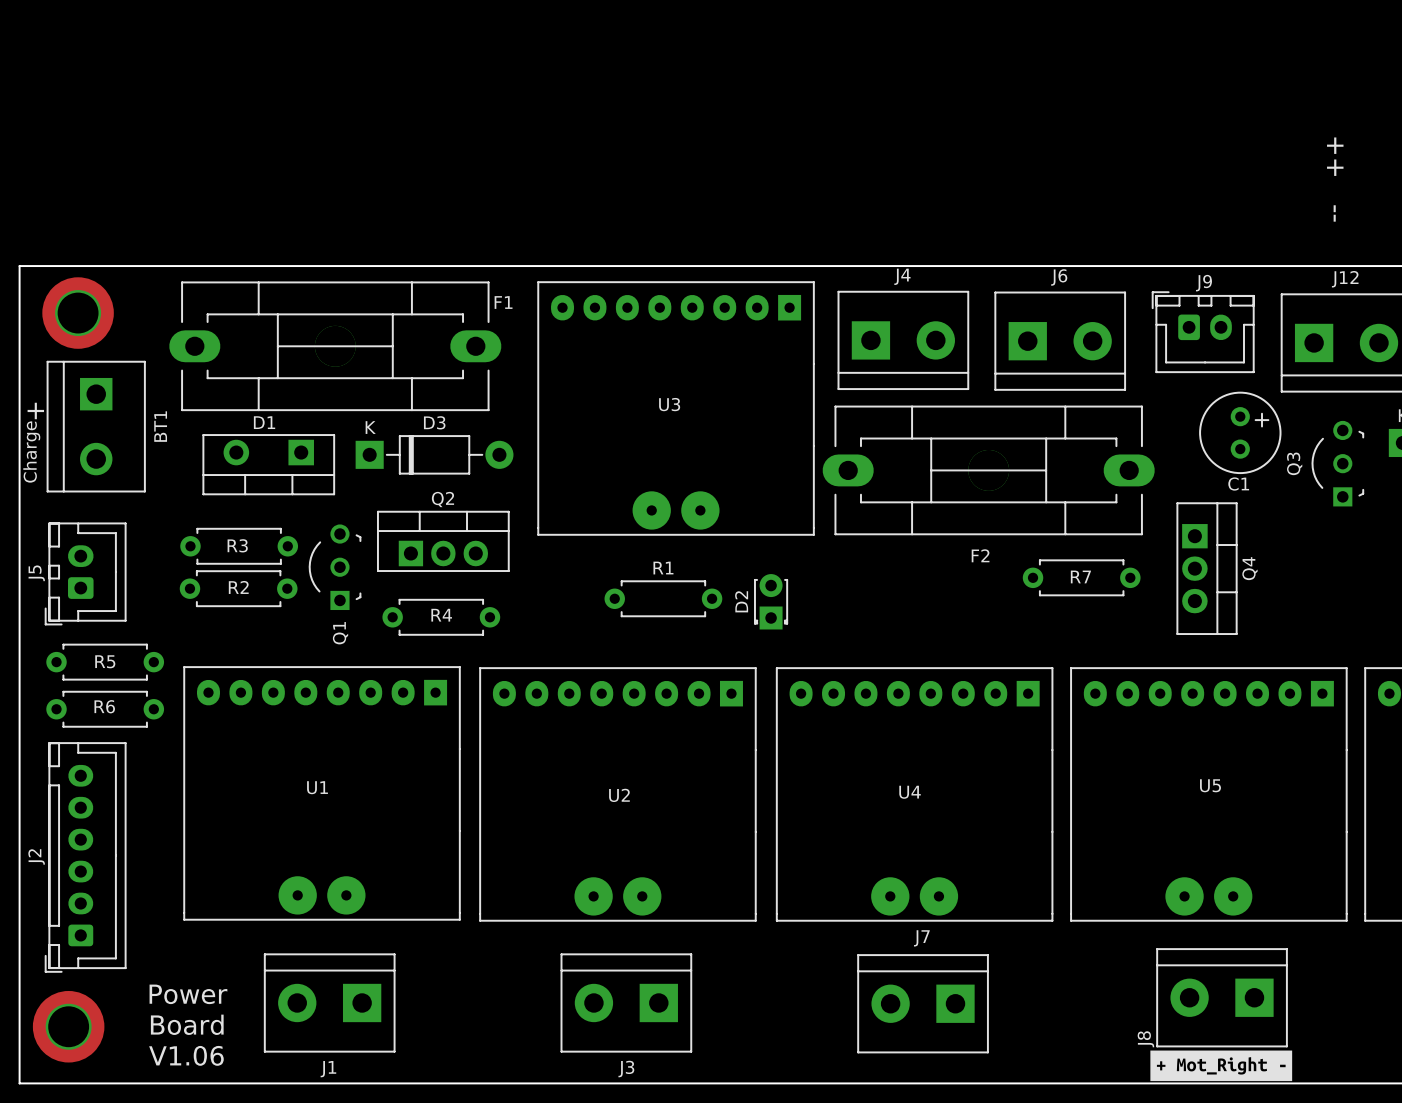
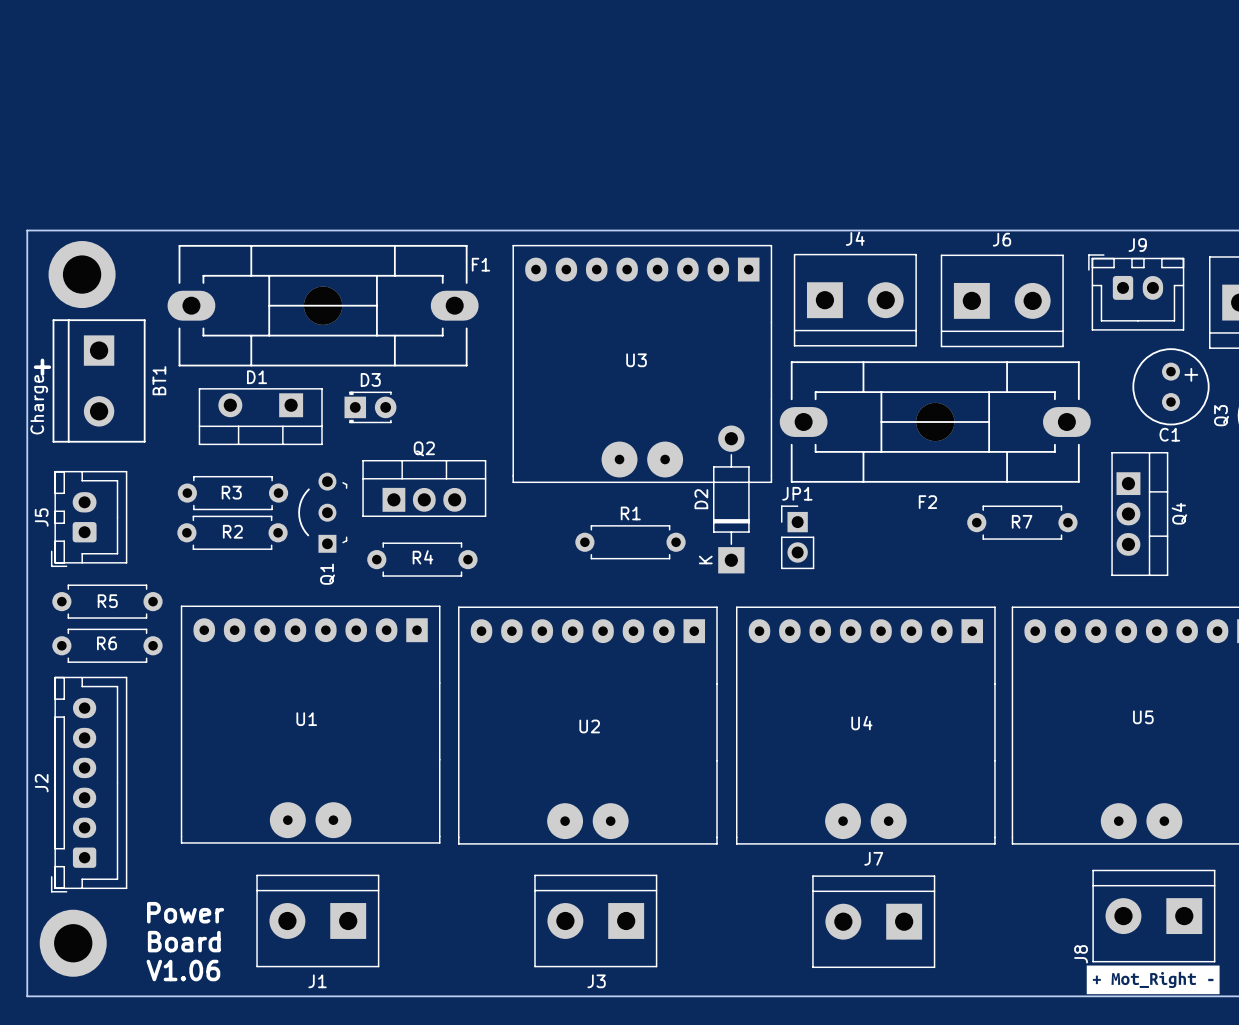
D3 footprint: [355, 435, 514, 475] -> [344, 391, 397, 424]
D2 footprint: [754, 574, 788, 630] -> [713, 425, 750, 574]
JP1: none -> (797, 537)

